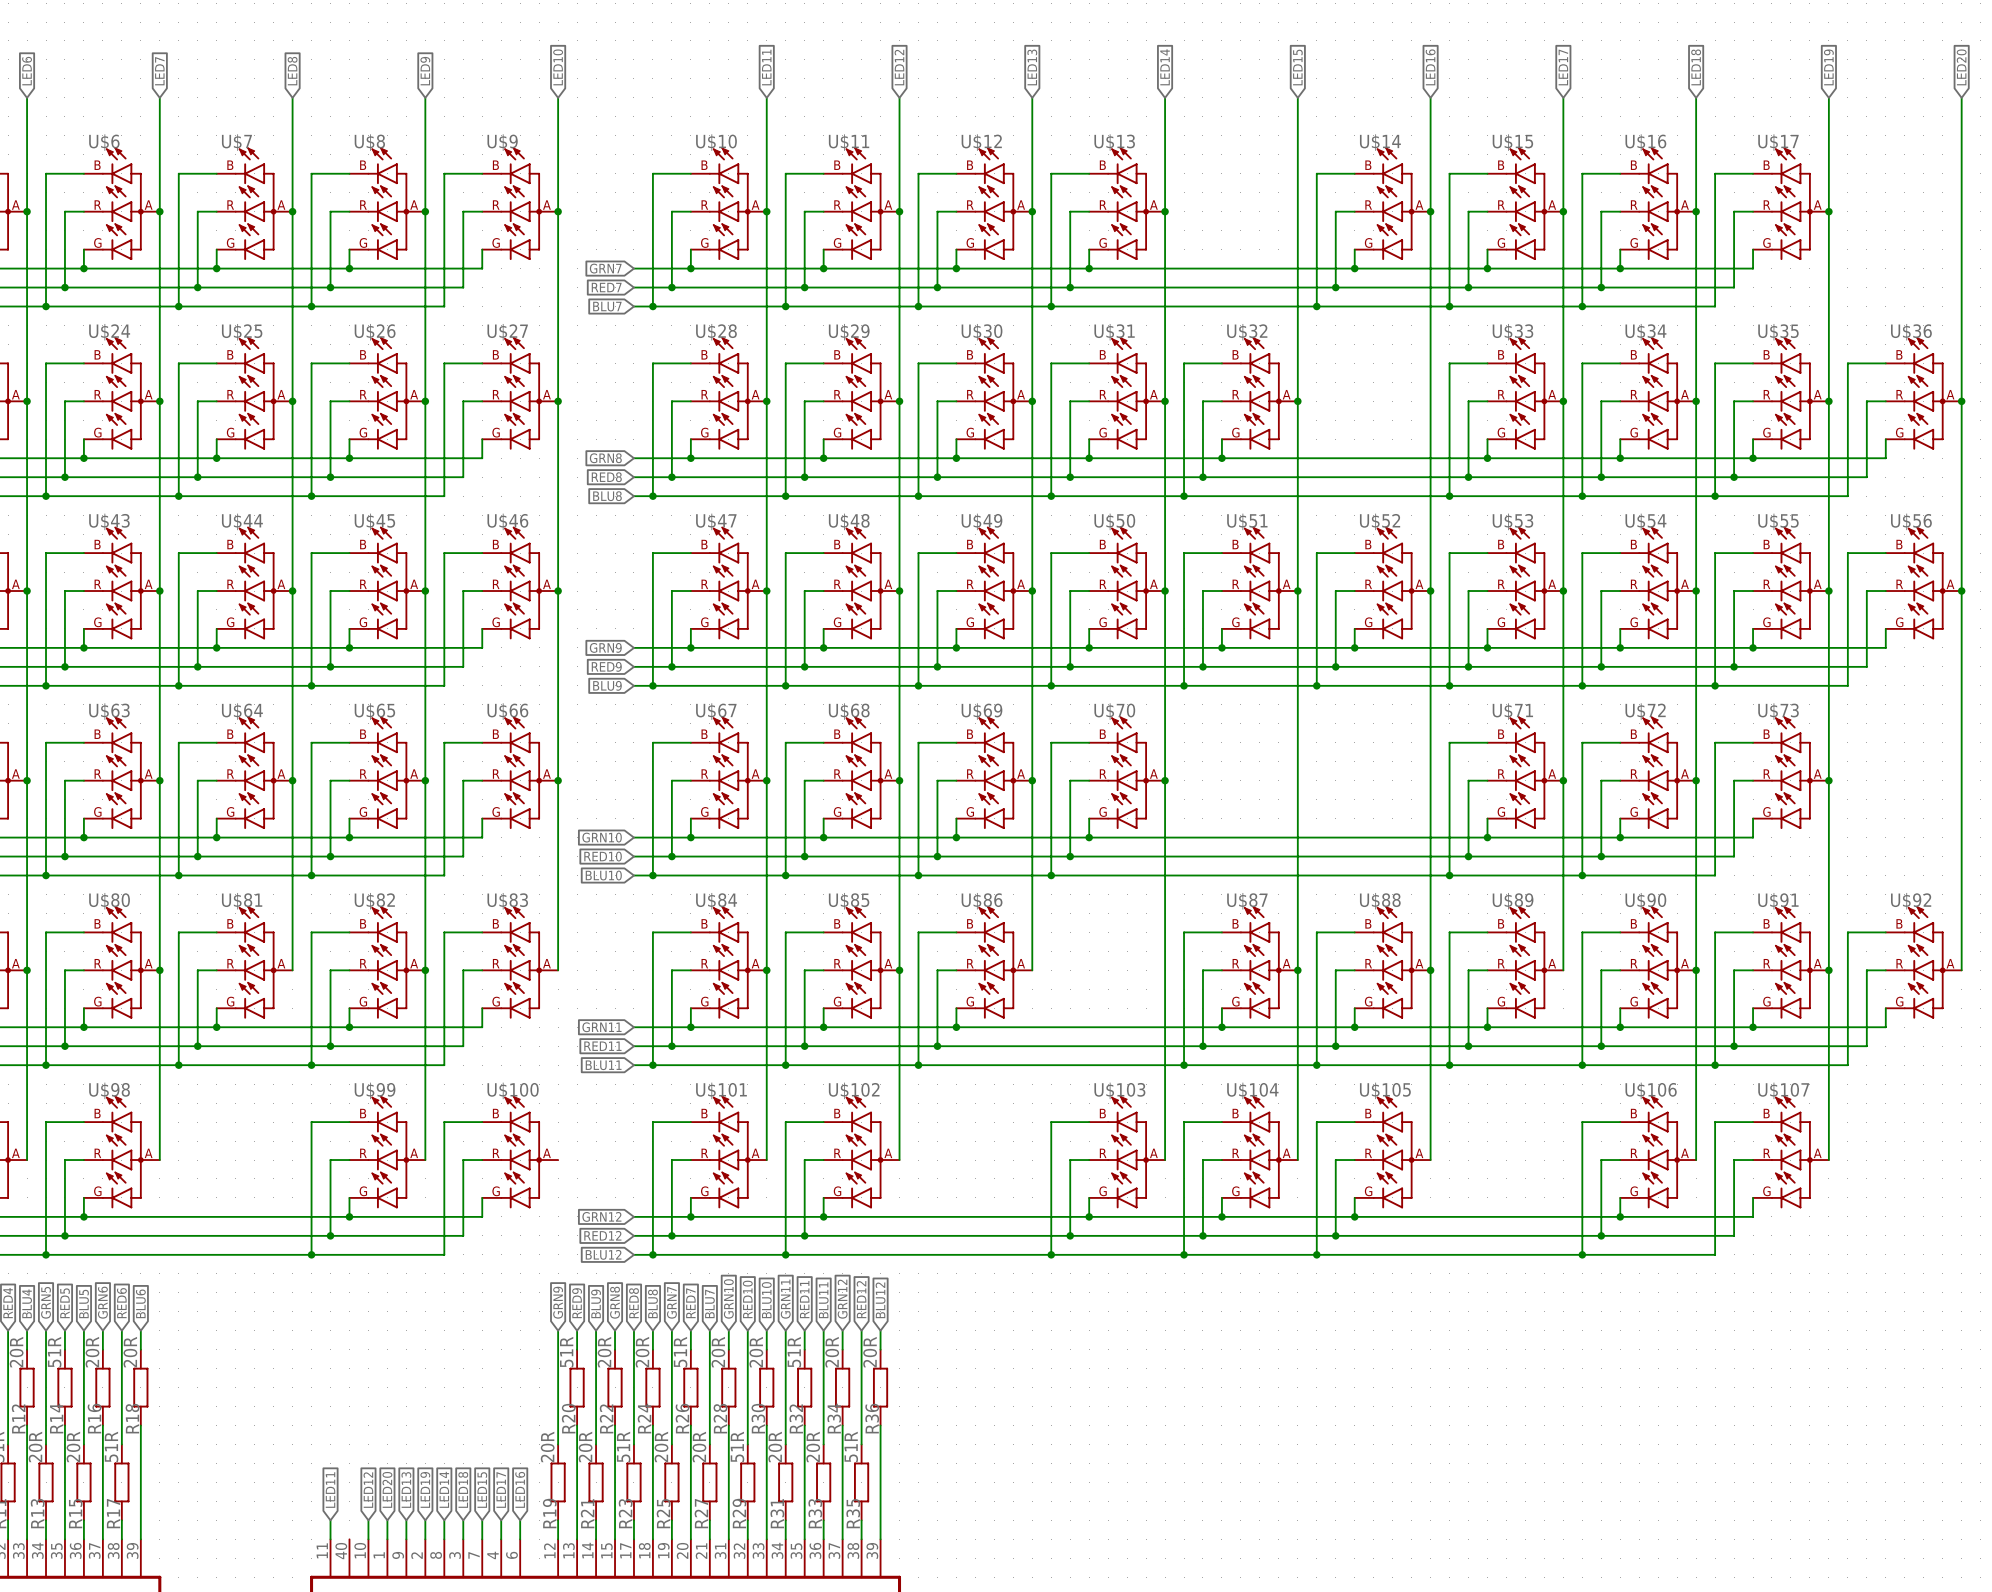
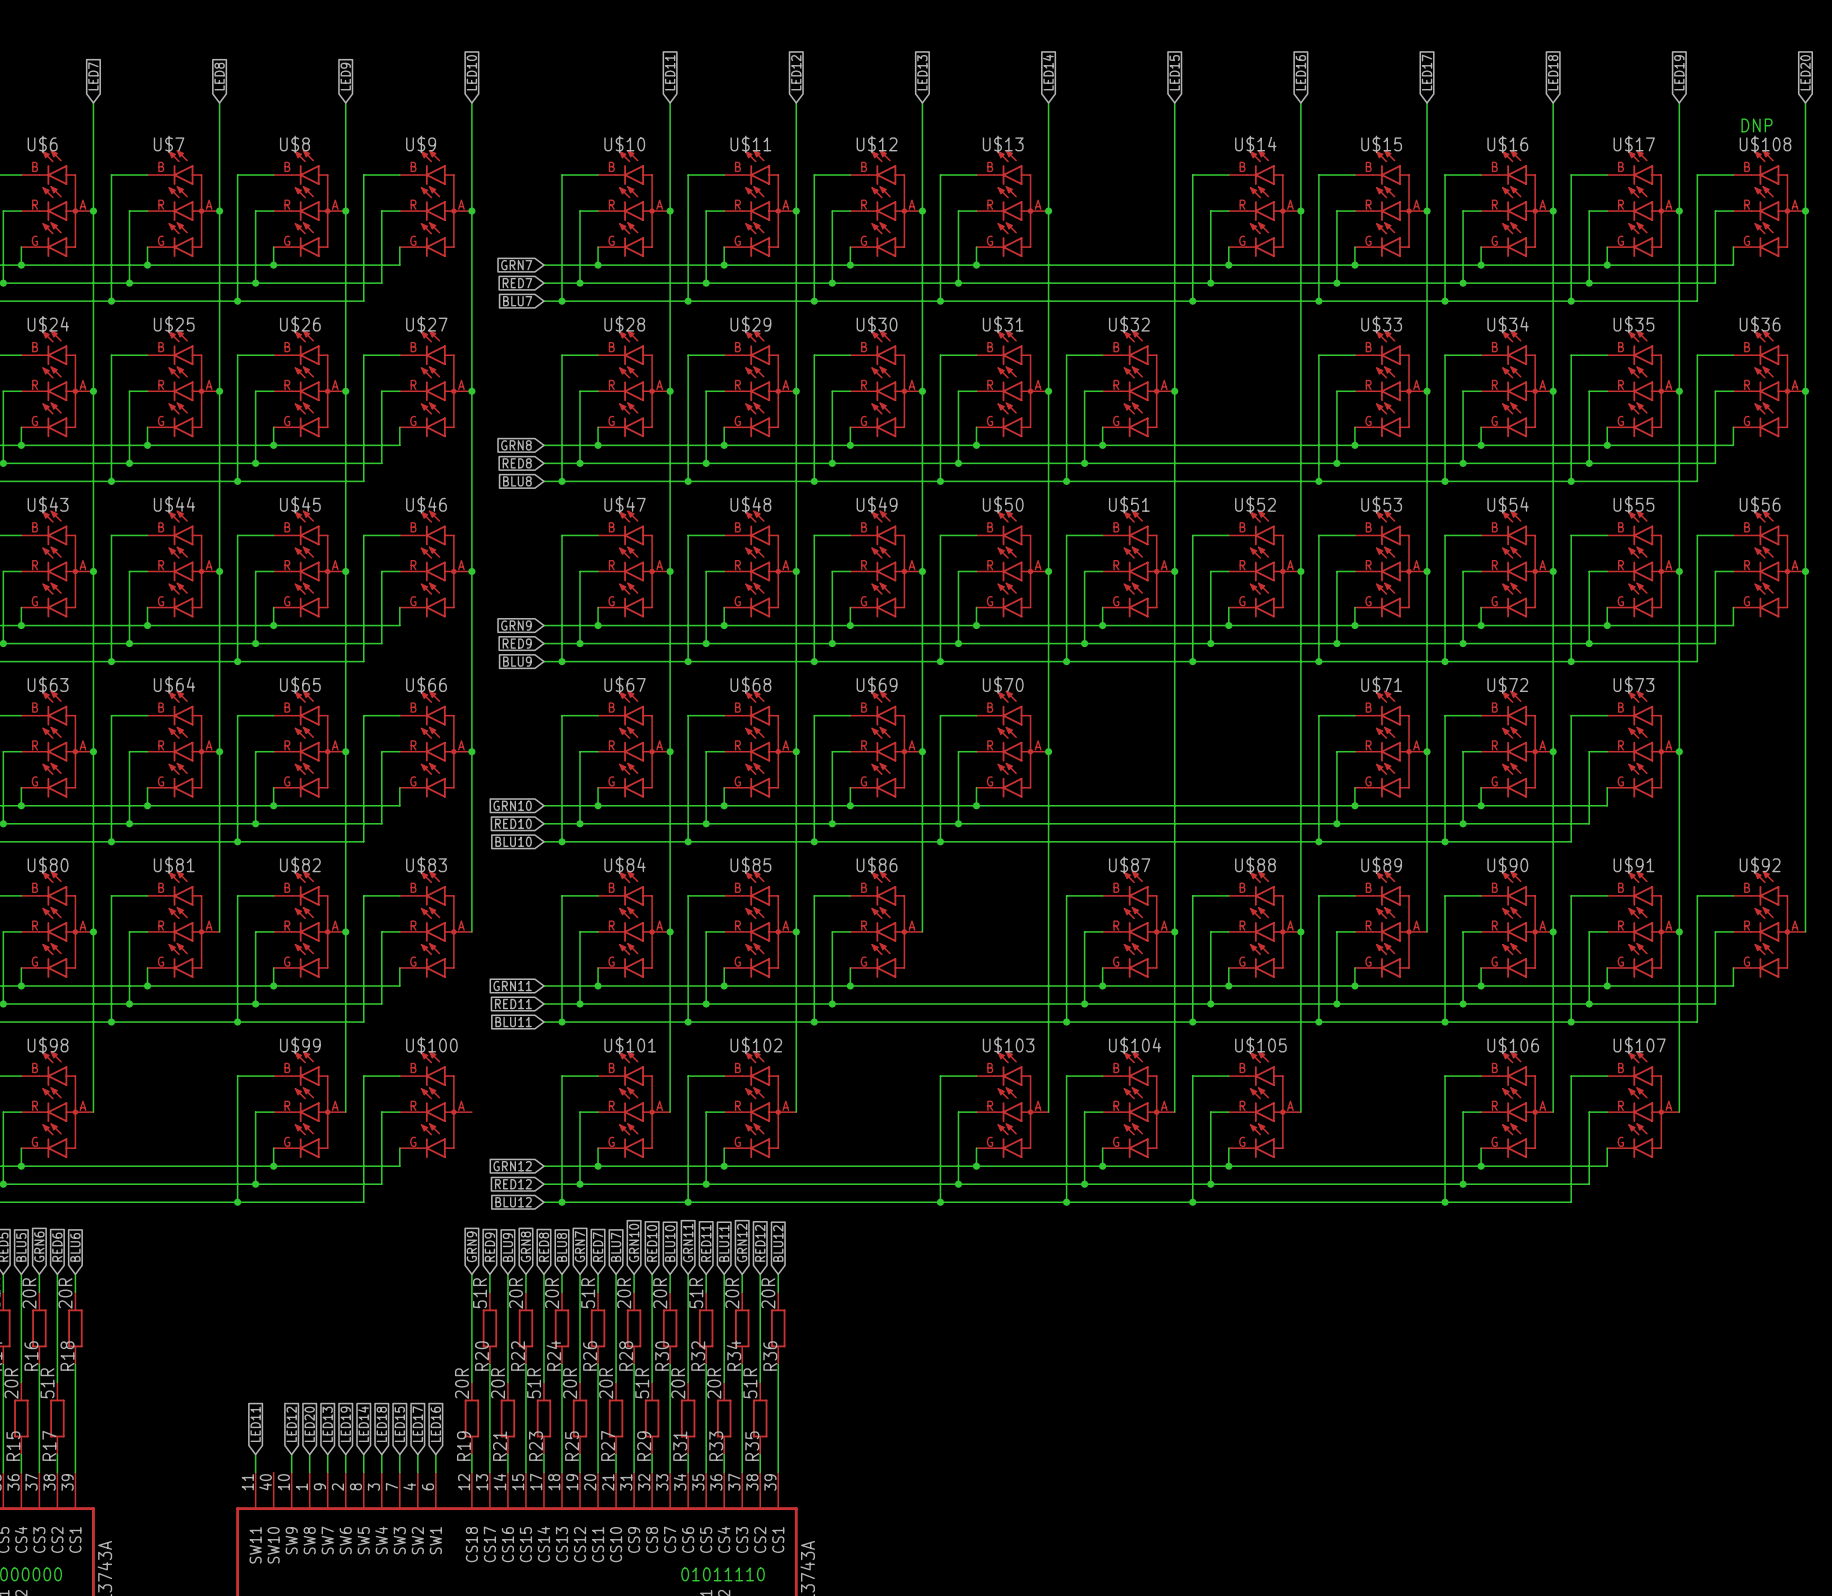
text: none -> DNP (1757, 125)
wire: none -> (1733, 175) (1697, 175) (1697, 301) (1571, 301)
U$108: none -> (1769, 203)
wire: none -> (1733, 211) (1715, 211) (1715, 283) (1589, 283)
junction: none -> (1805, 211)
wire: none -> (1733, 247) (1733, 265) (1607, 265)
junction: none -> (1607, 265)
junction: none -> (1589, 283)
junction: none -> (1571, 301)

